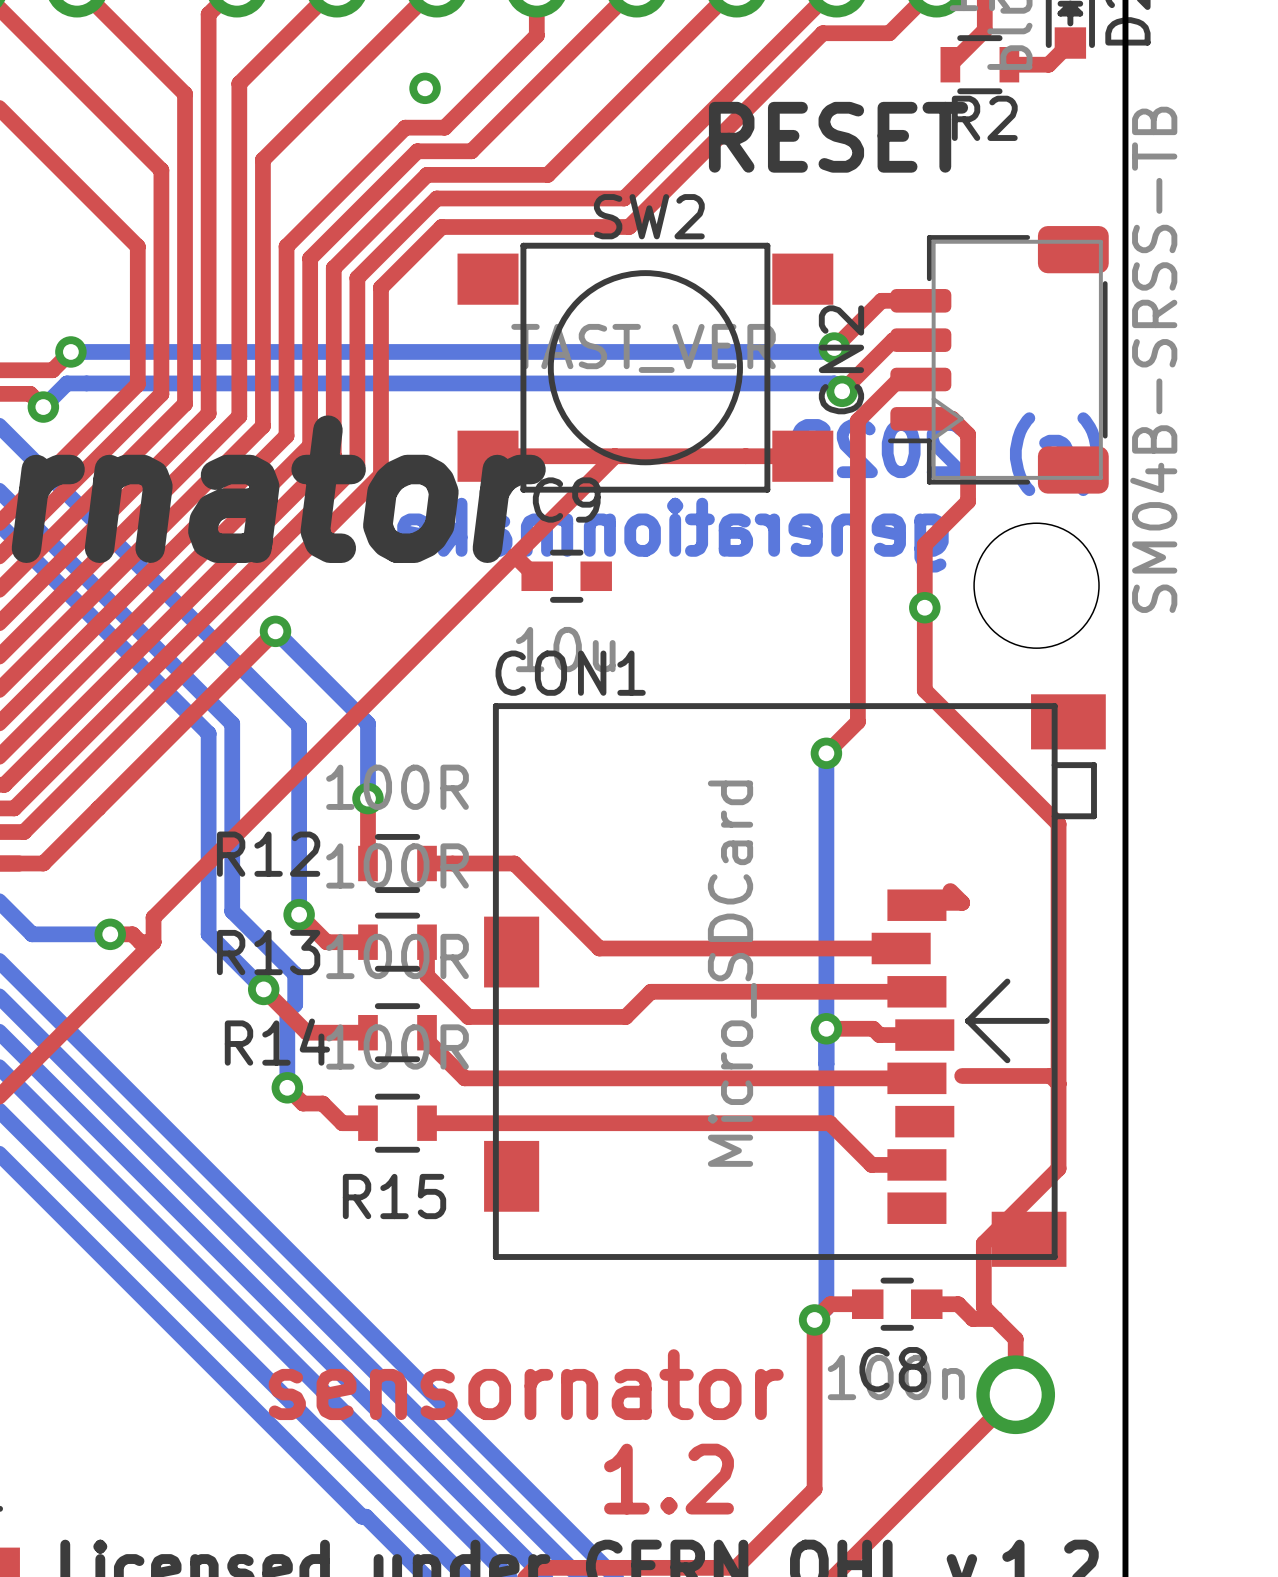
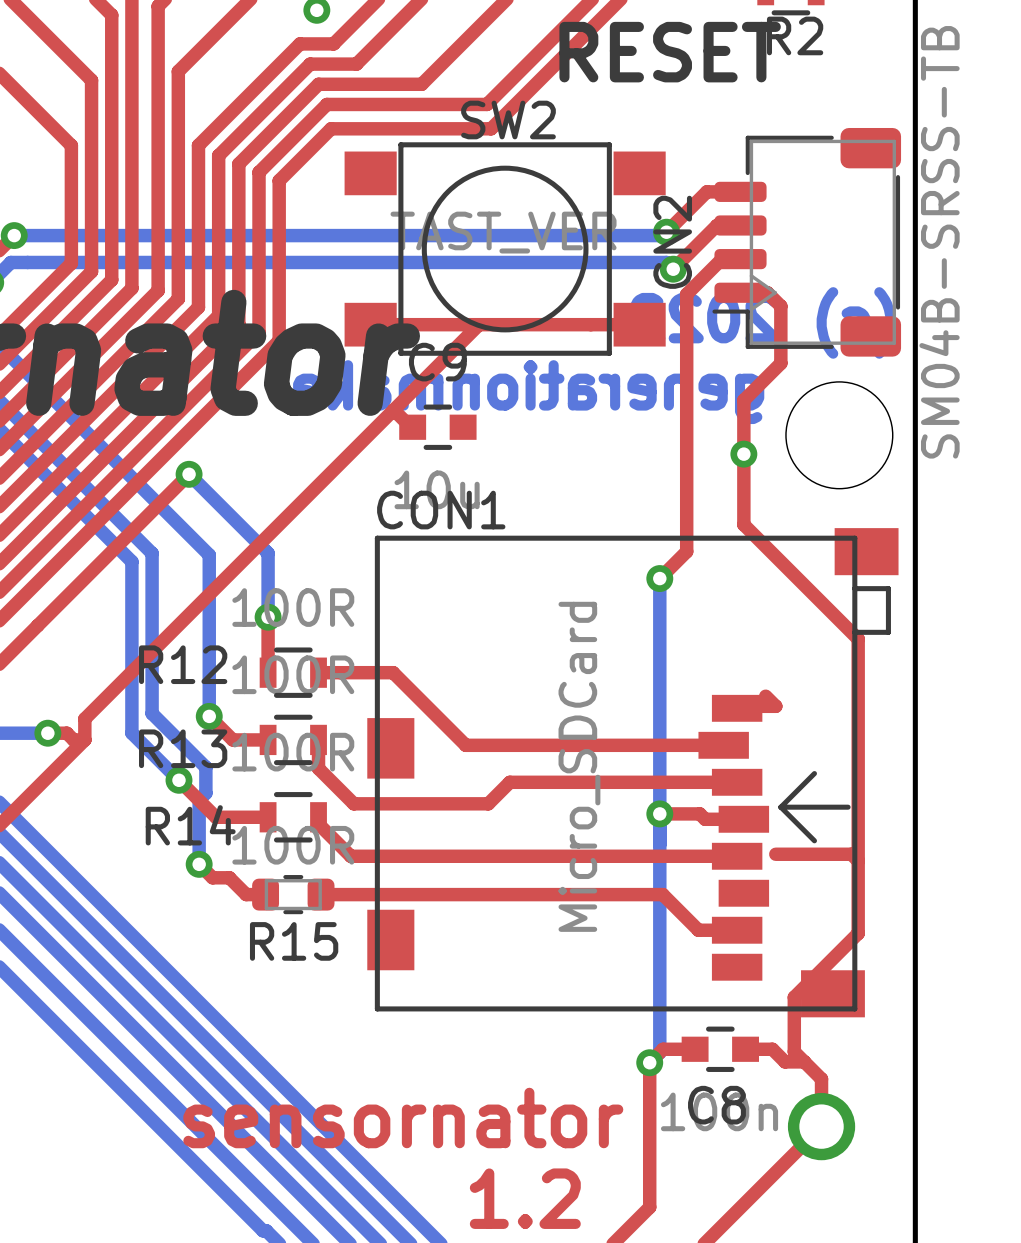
R15 footprint: [358, 1093, 437, 1153] -> [252, 875, 335, 915]

